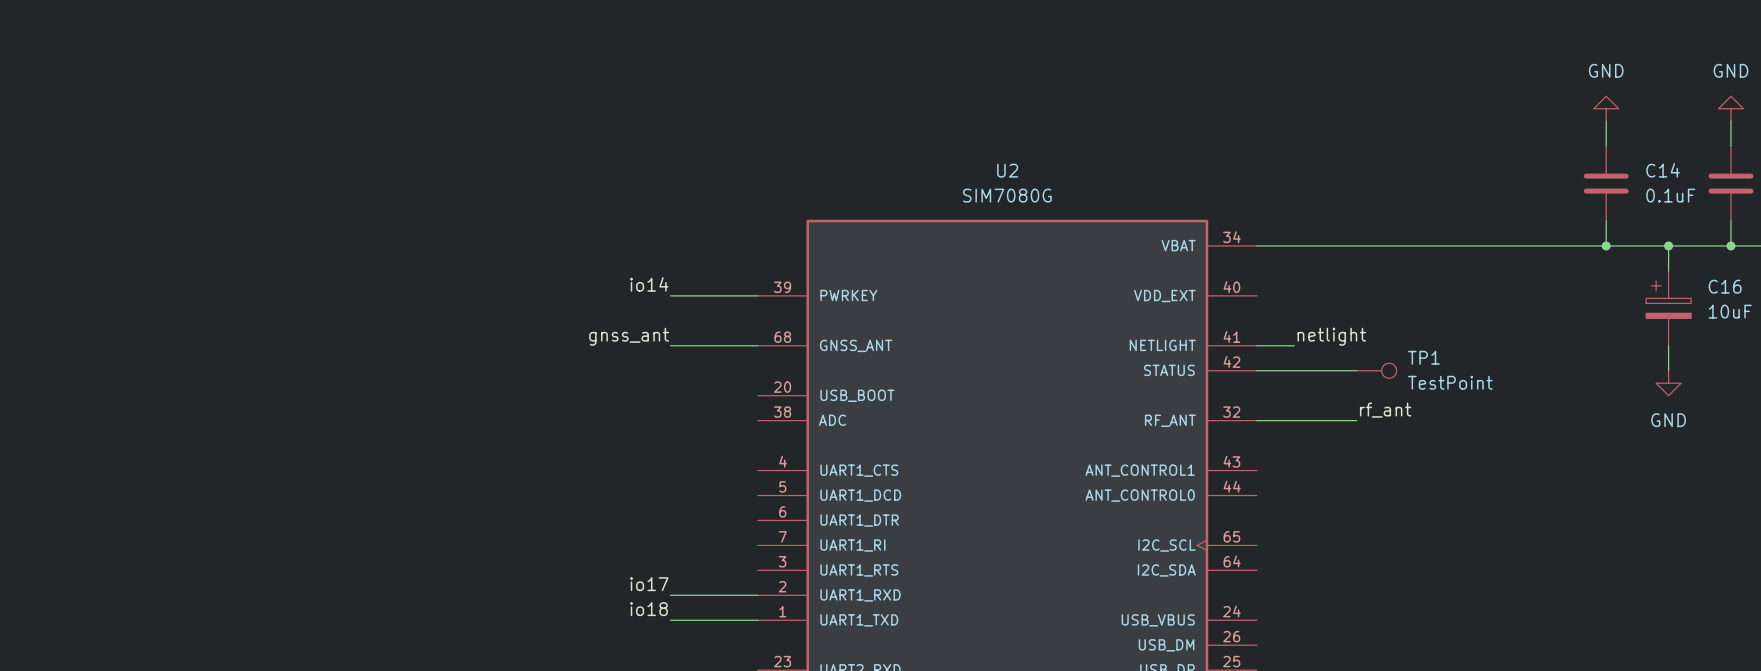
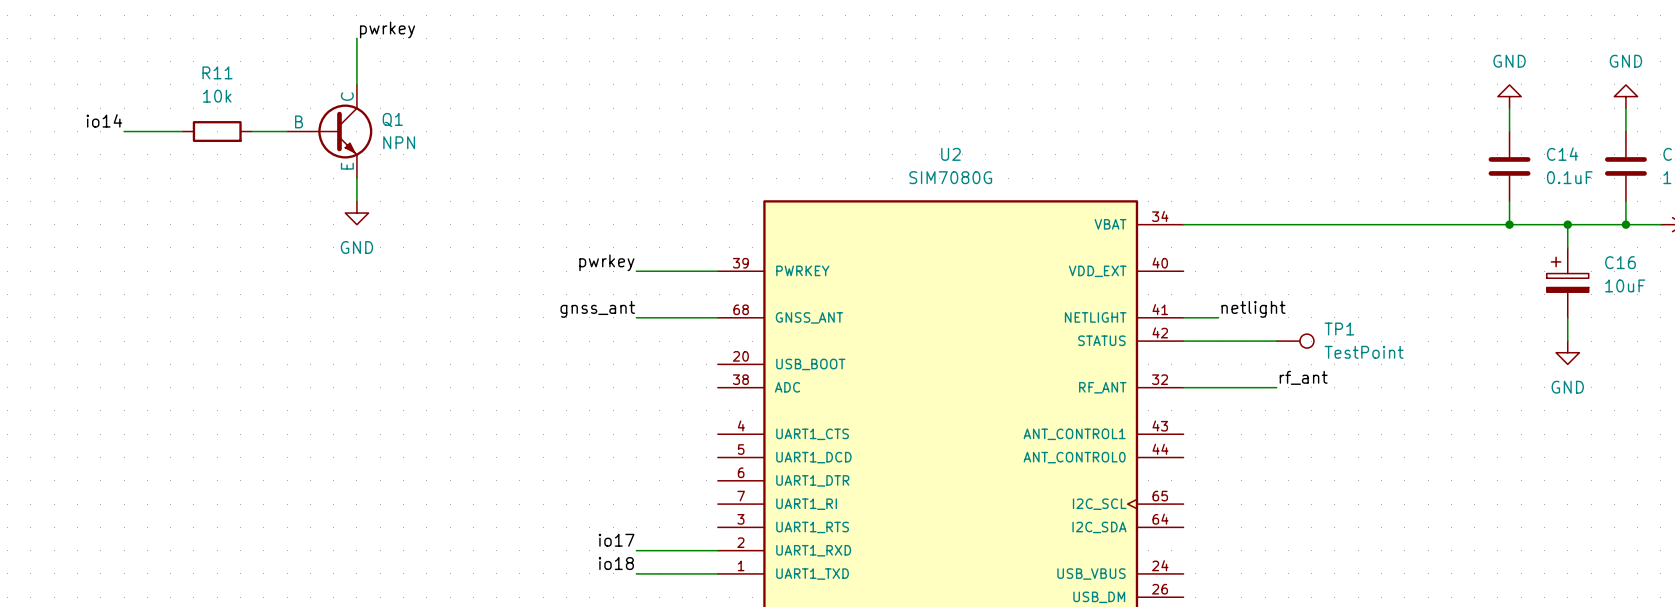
label: none -> pwrkey (387, 29)
wire: none -> (356, 38) (356, 84)
label: none -> io14 (104, 120)
wire: none -> (124, 131) (182, 131)
R11: none -> 10k (217, 131)
wire: none -> (252, 131) (287, 131)
Q1: none -> NPN (329, 131)
wire: none -> (356, 178) (356, 201)
power symbol: none -> GND (356, 213)
label: io14 (649, 284) -> pwrkey (606, 262)

